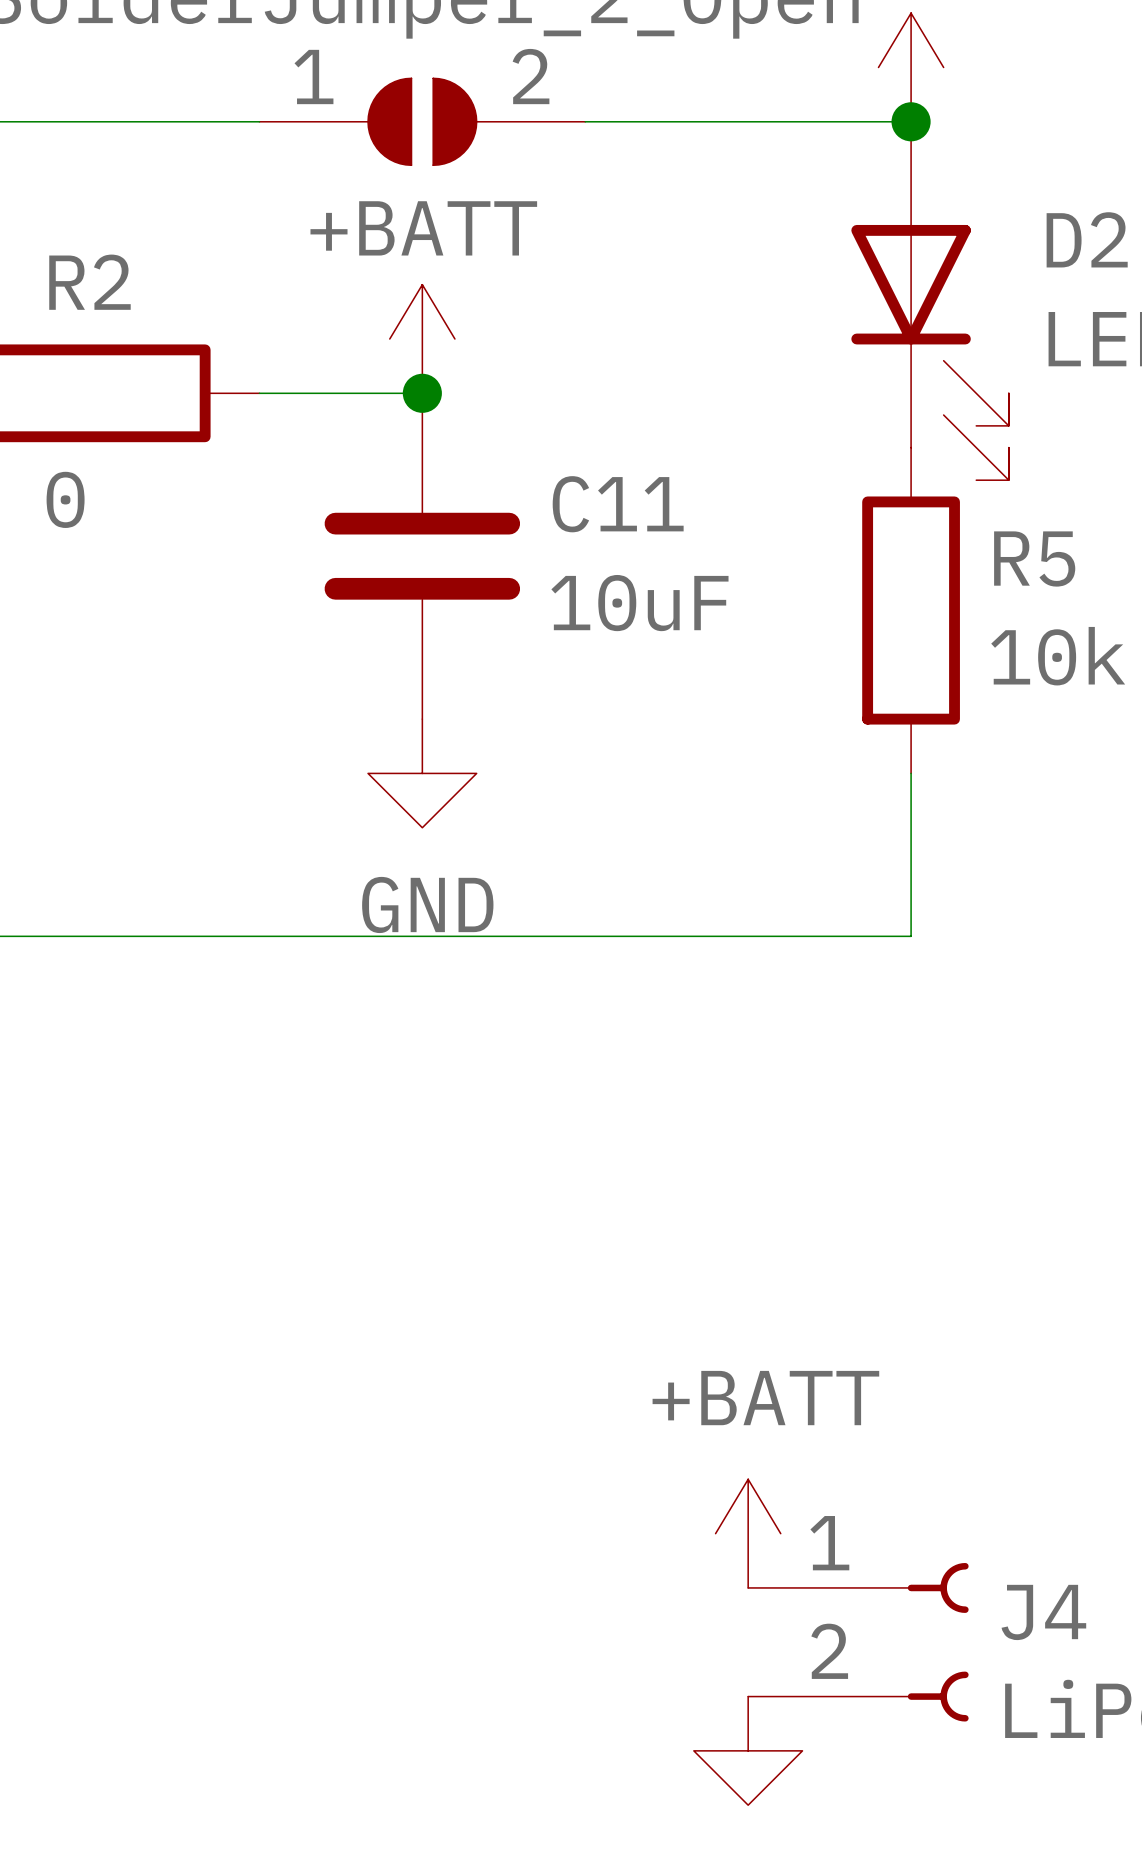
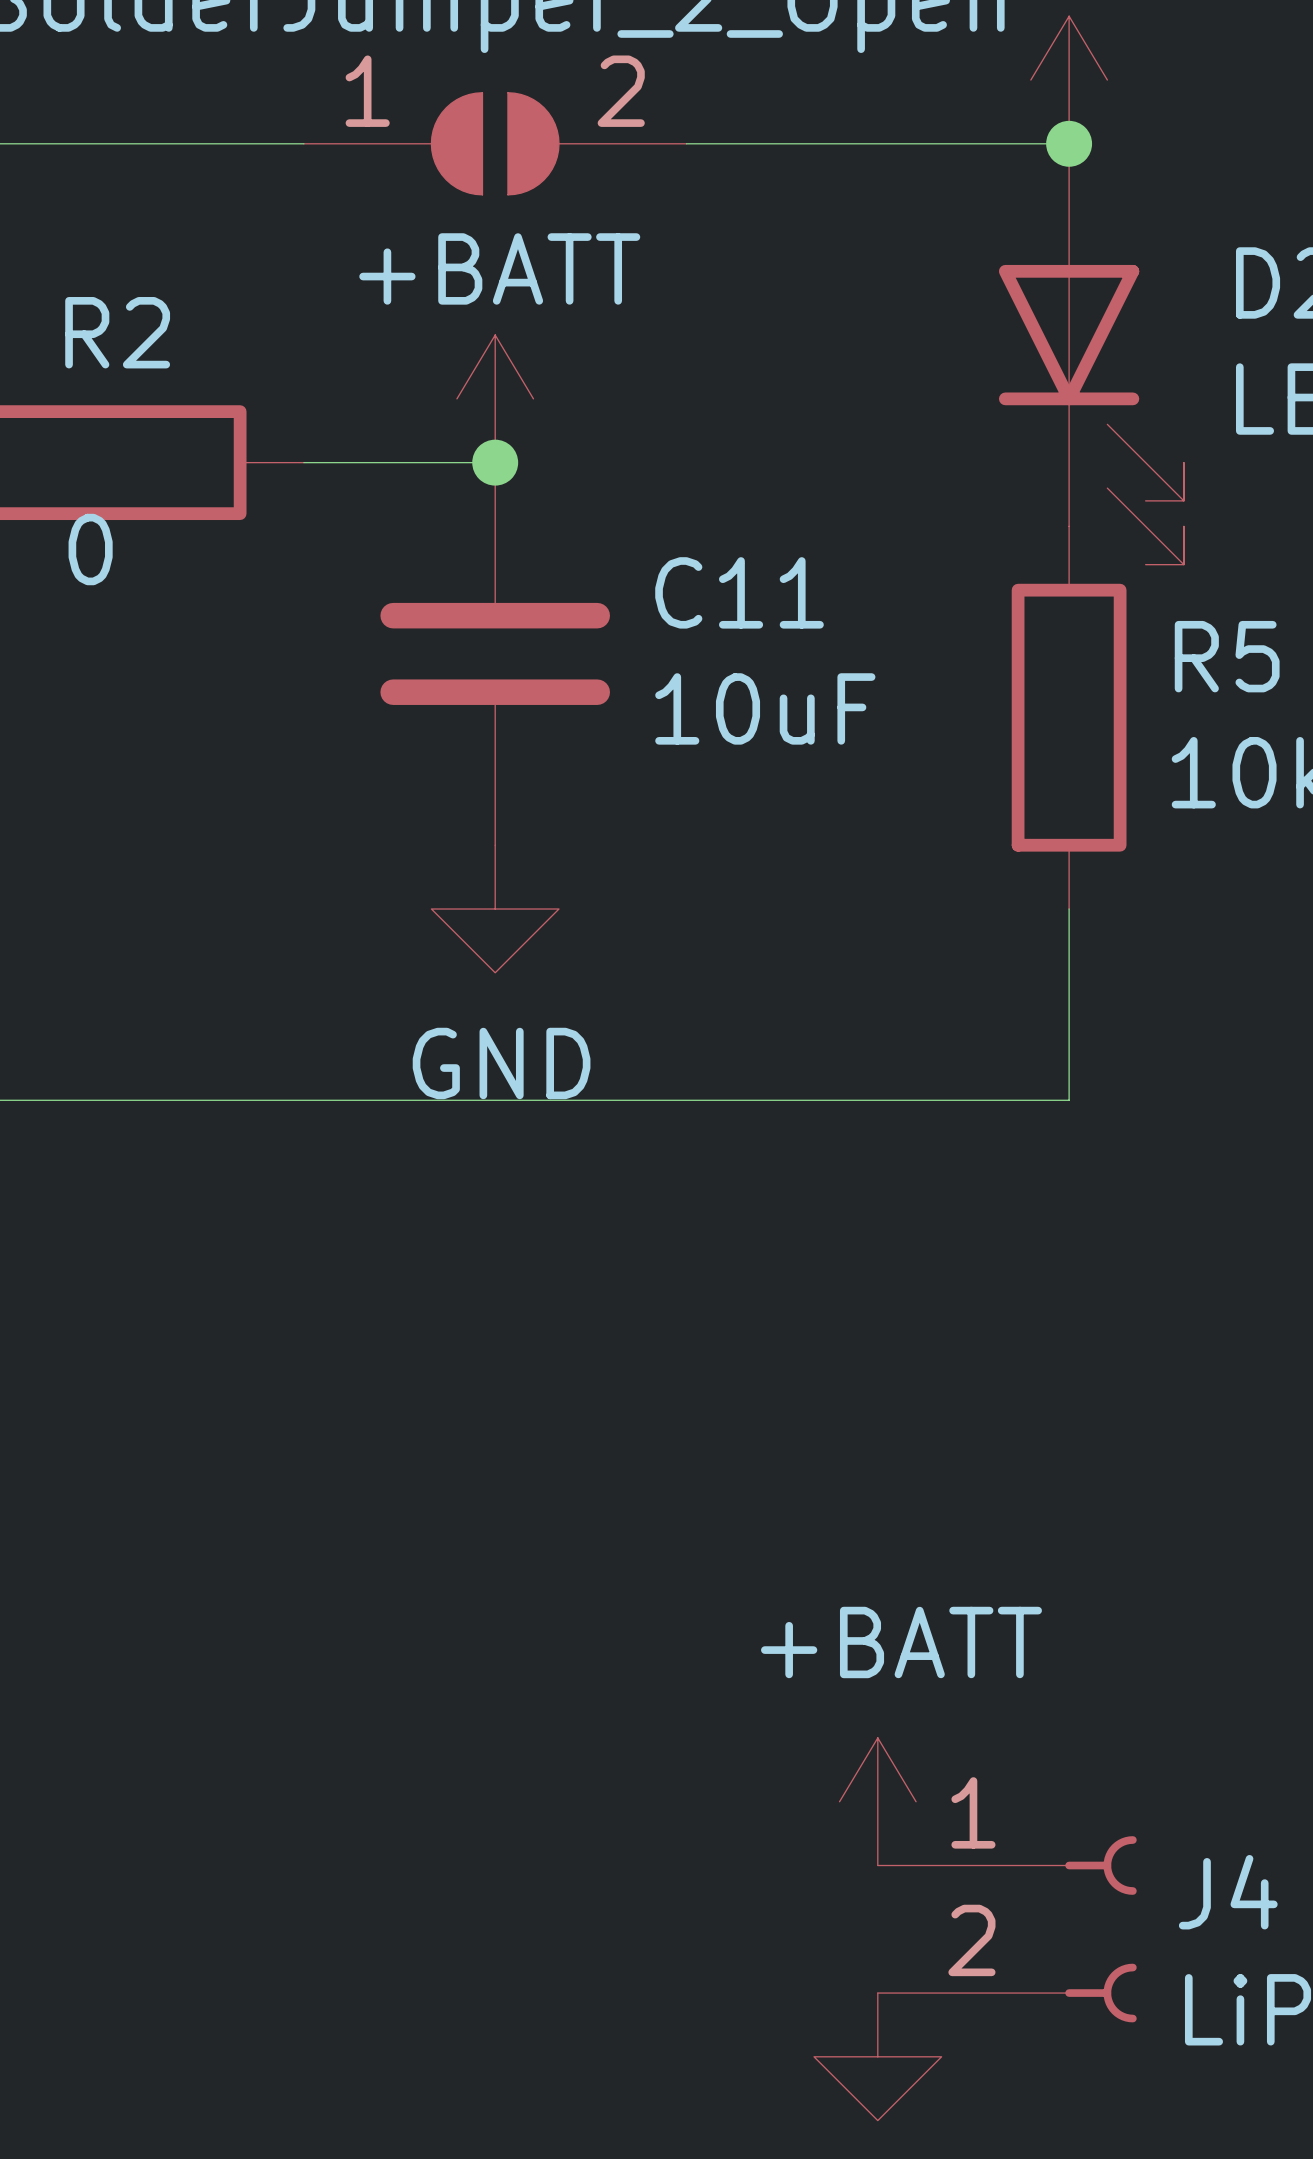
R2 value position: 0 (65, 499) -> 0 (90, 549)

